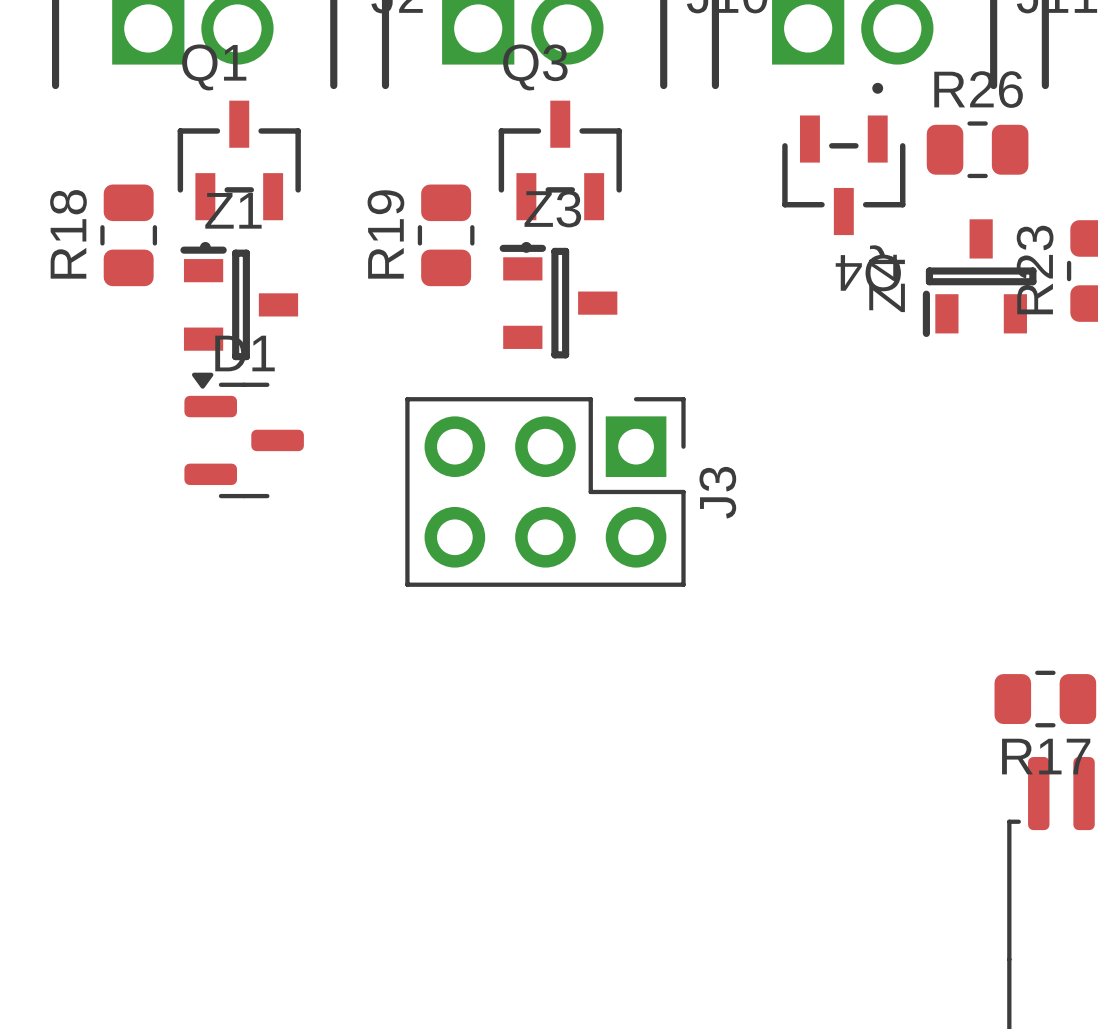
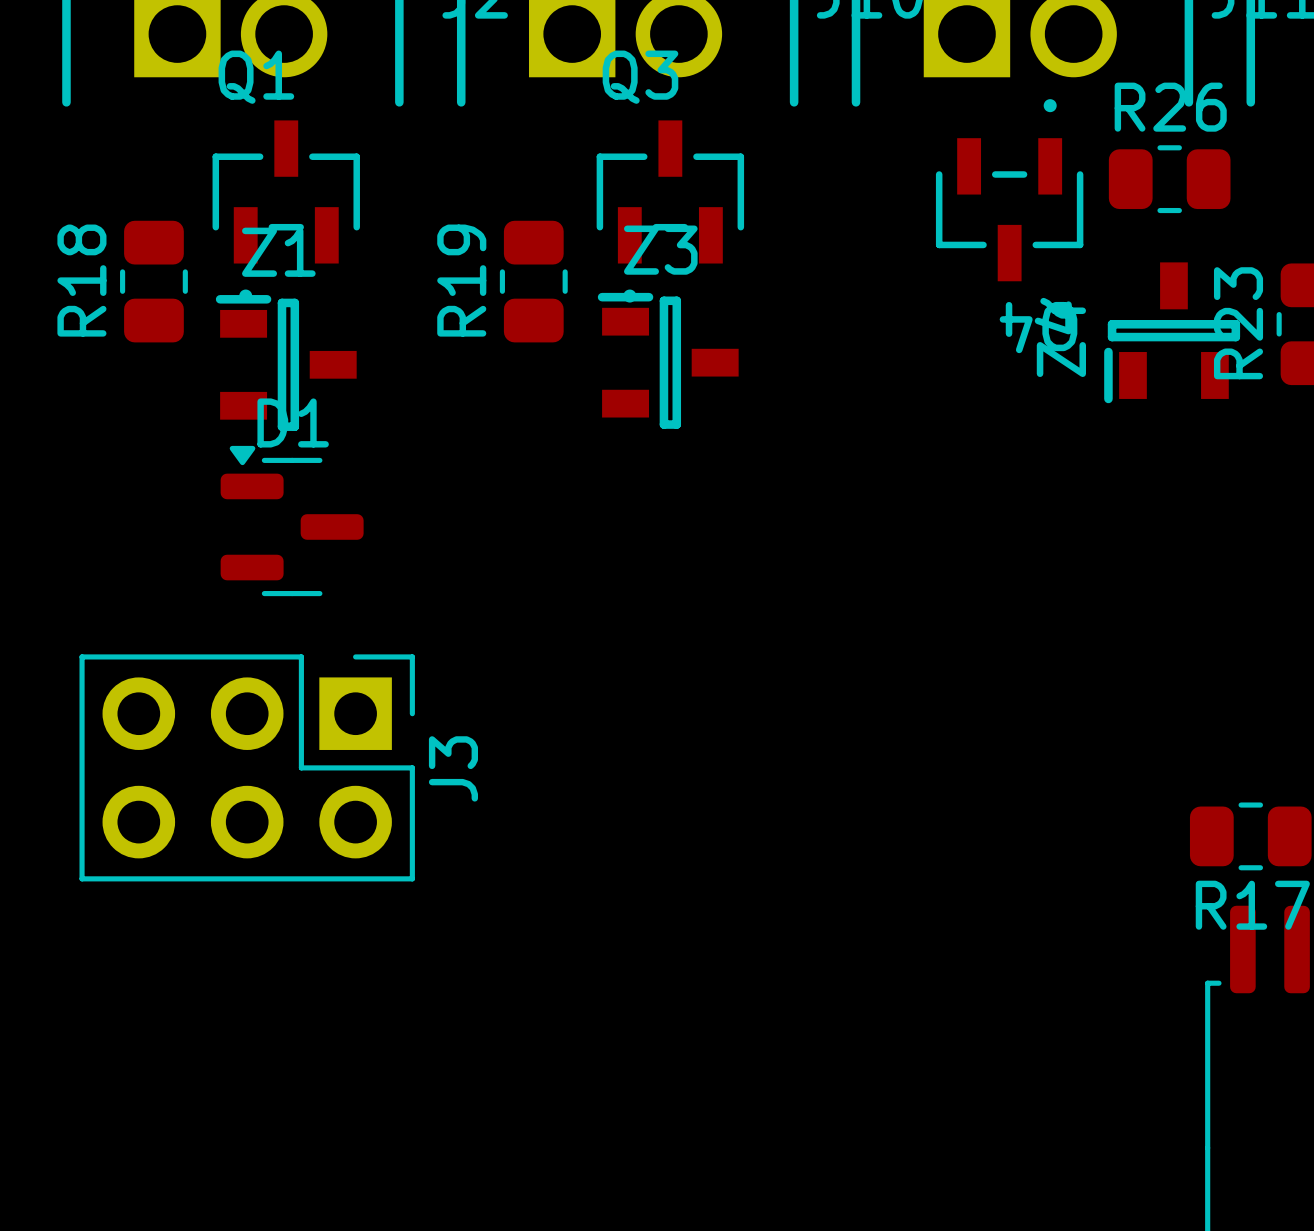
J3 position: (545, 491) -> (247, 767)

